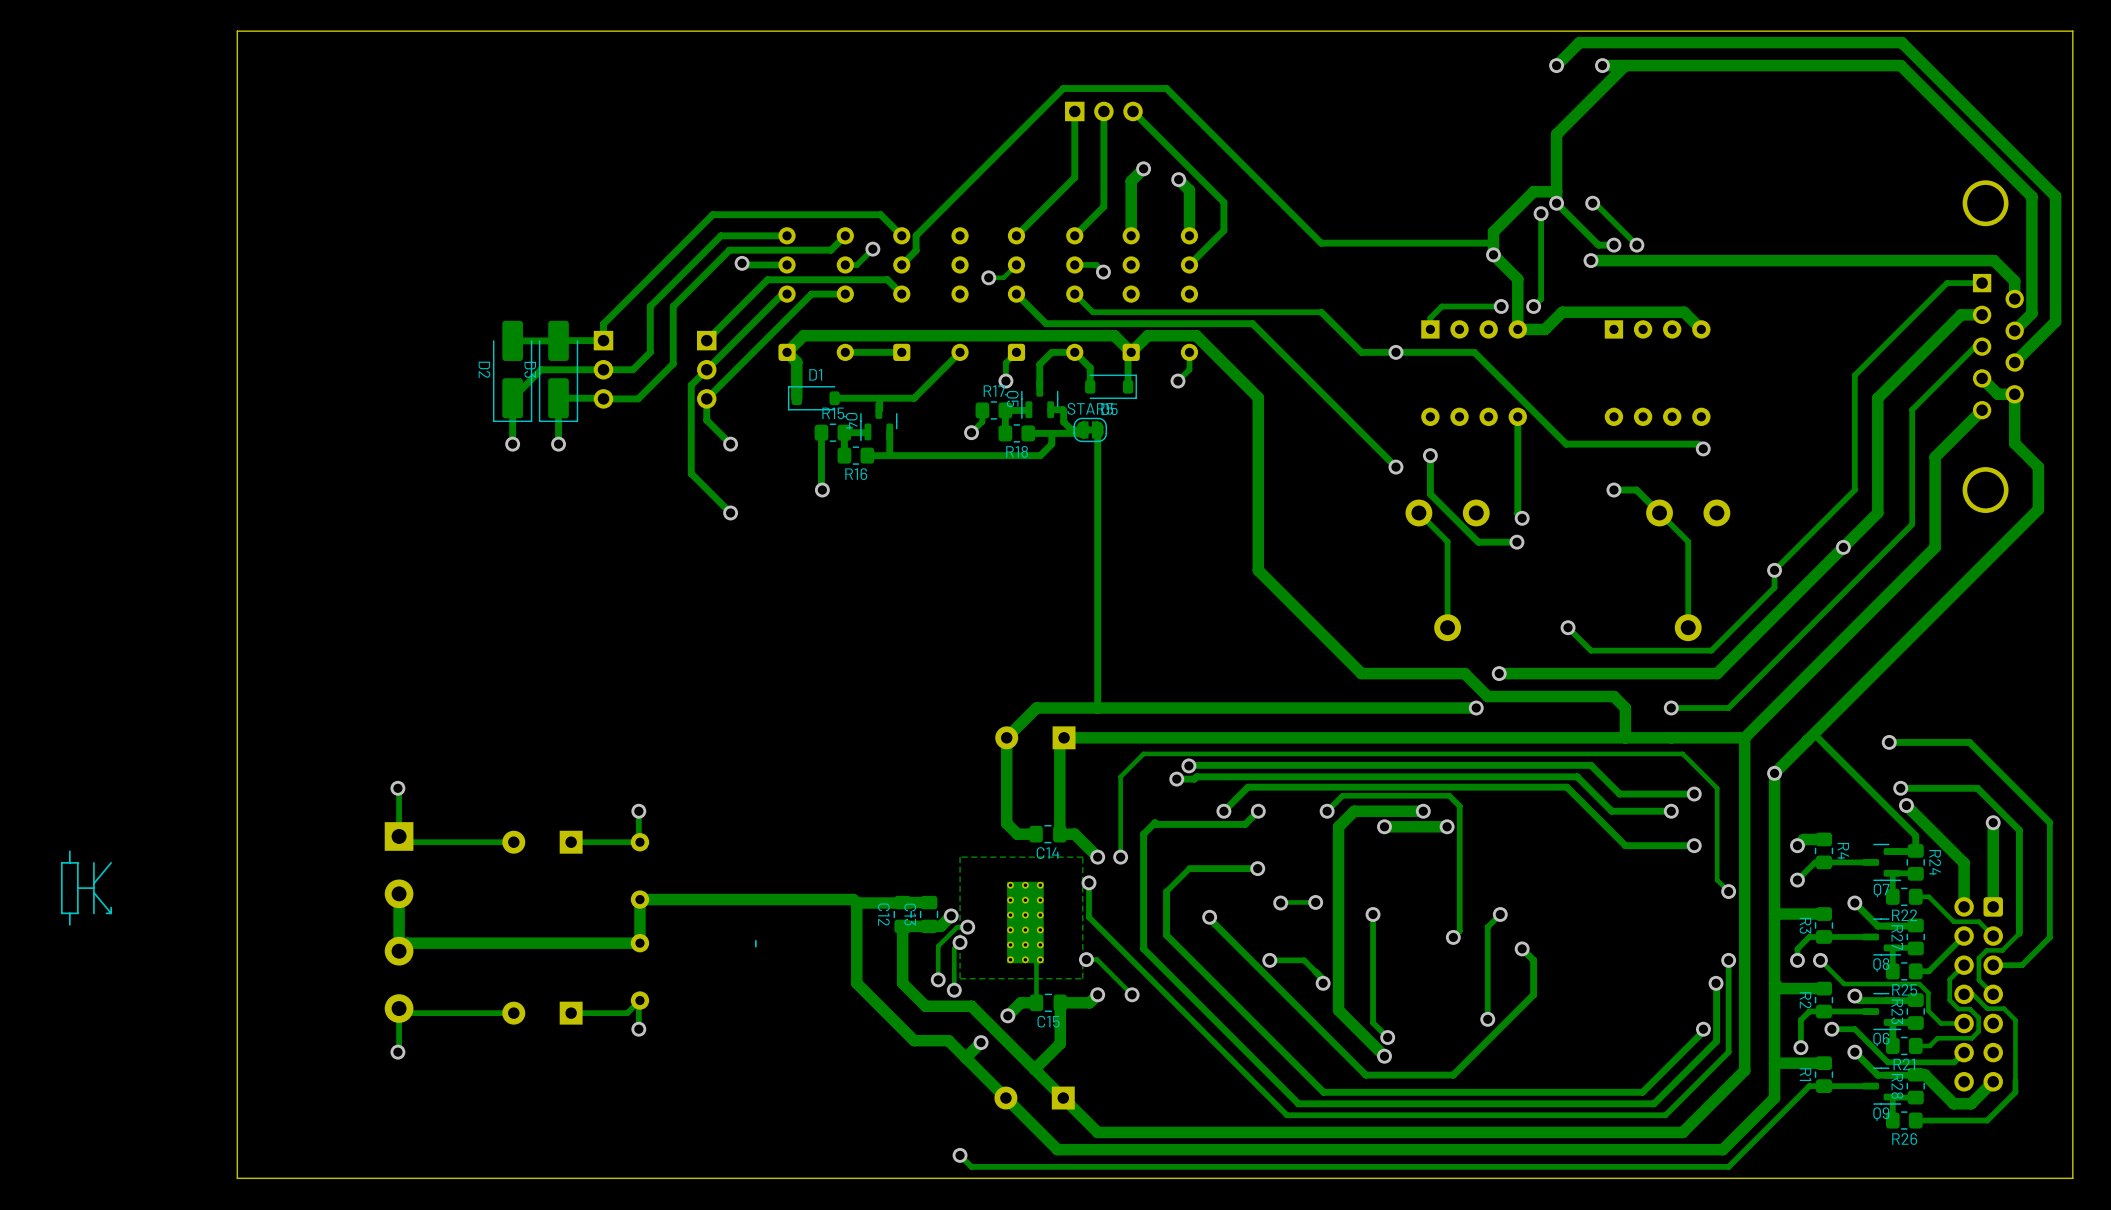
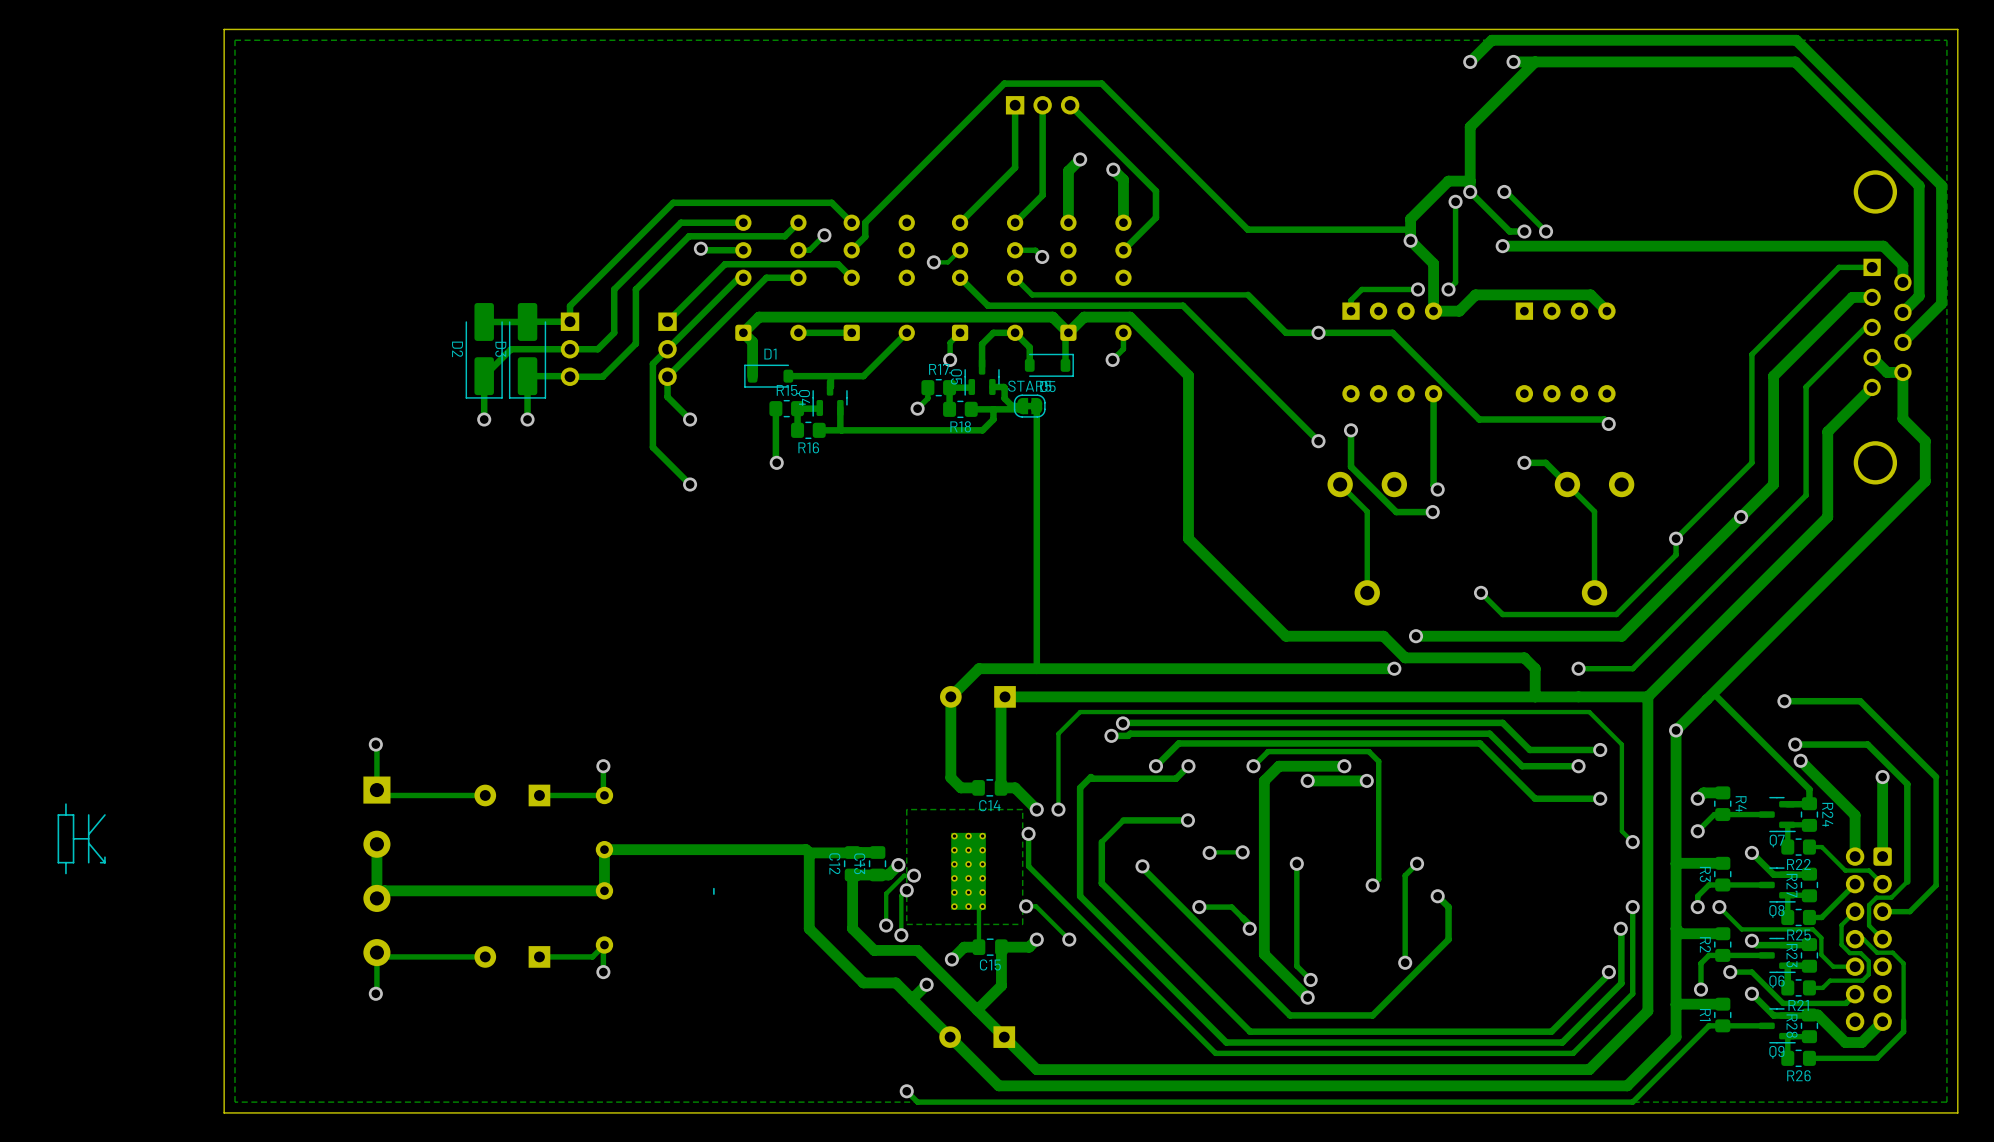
zone outline: none -> (1946, 40) (1946, 1102) (234, 1102) (234, 40) (1946, 40)

